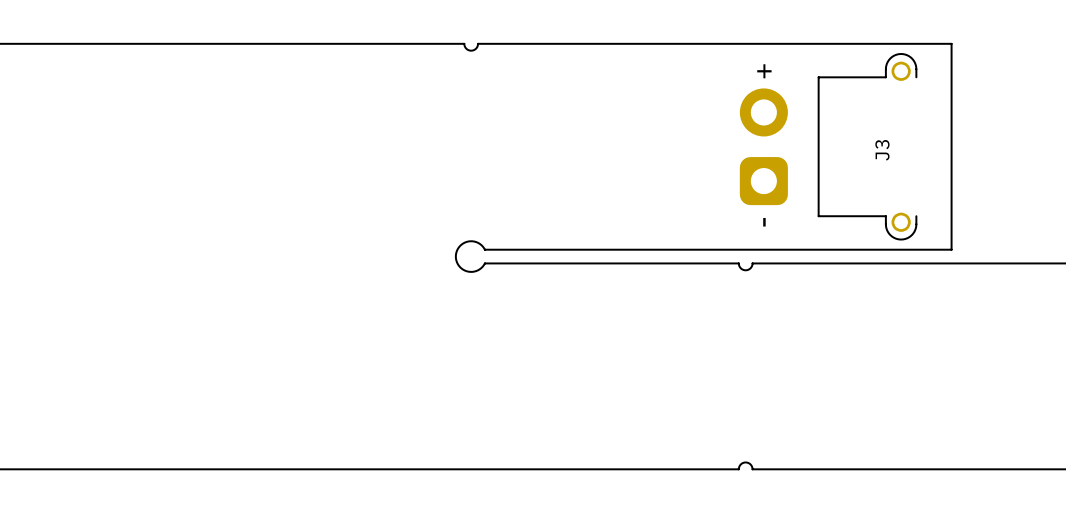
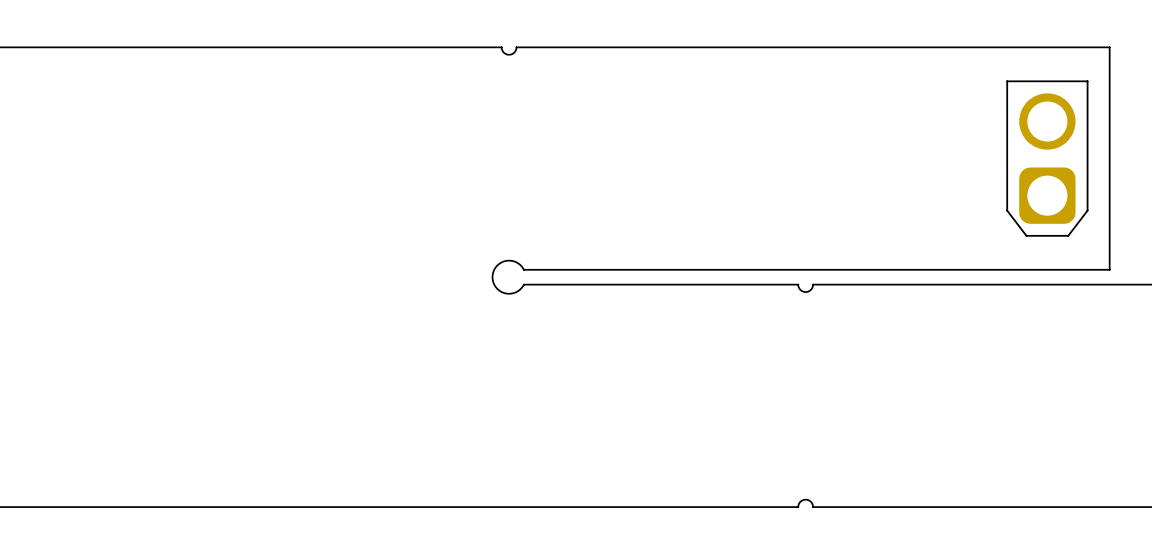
board edge: (951, 43) (951, 249) -> (1028, 47) (1109, 47) (1109, 269) (1028, 269)
J3: (828, 146) -> none
part: none -> (1047, 158)

